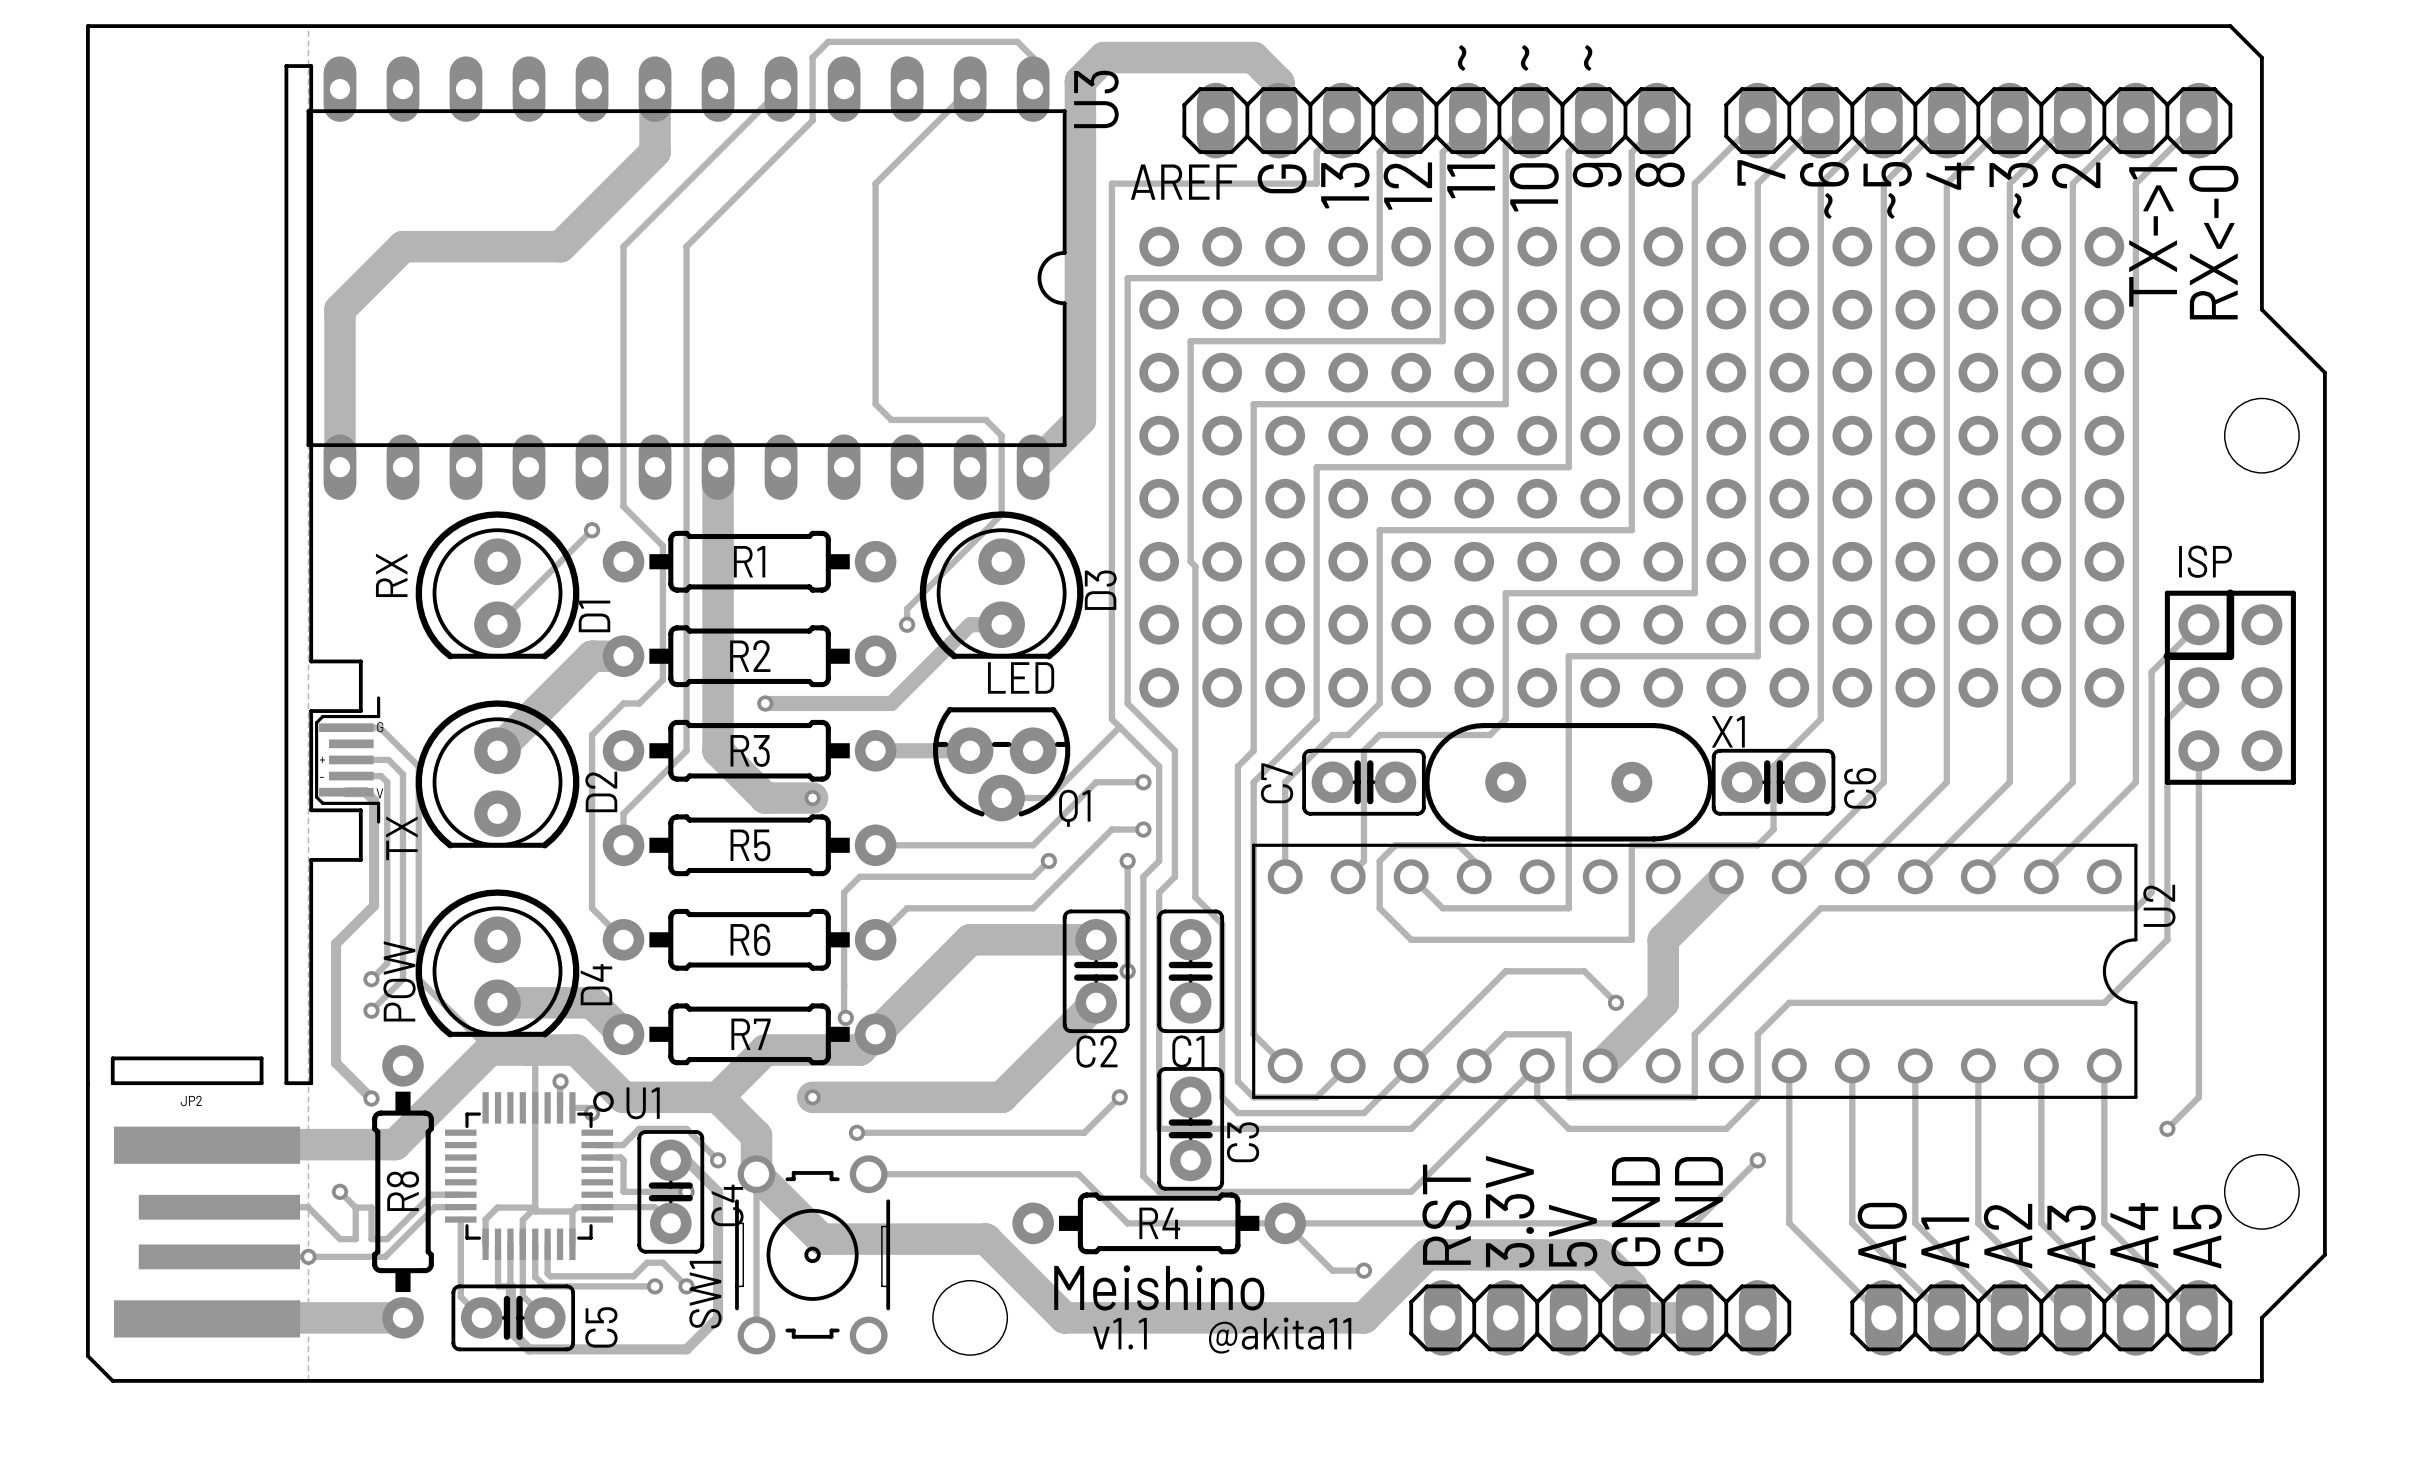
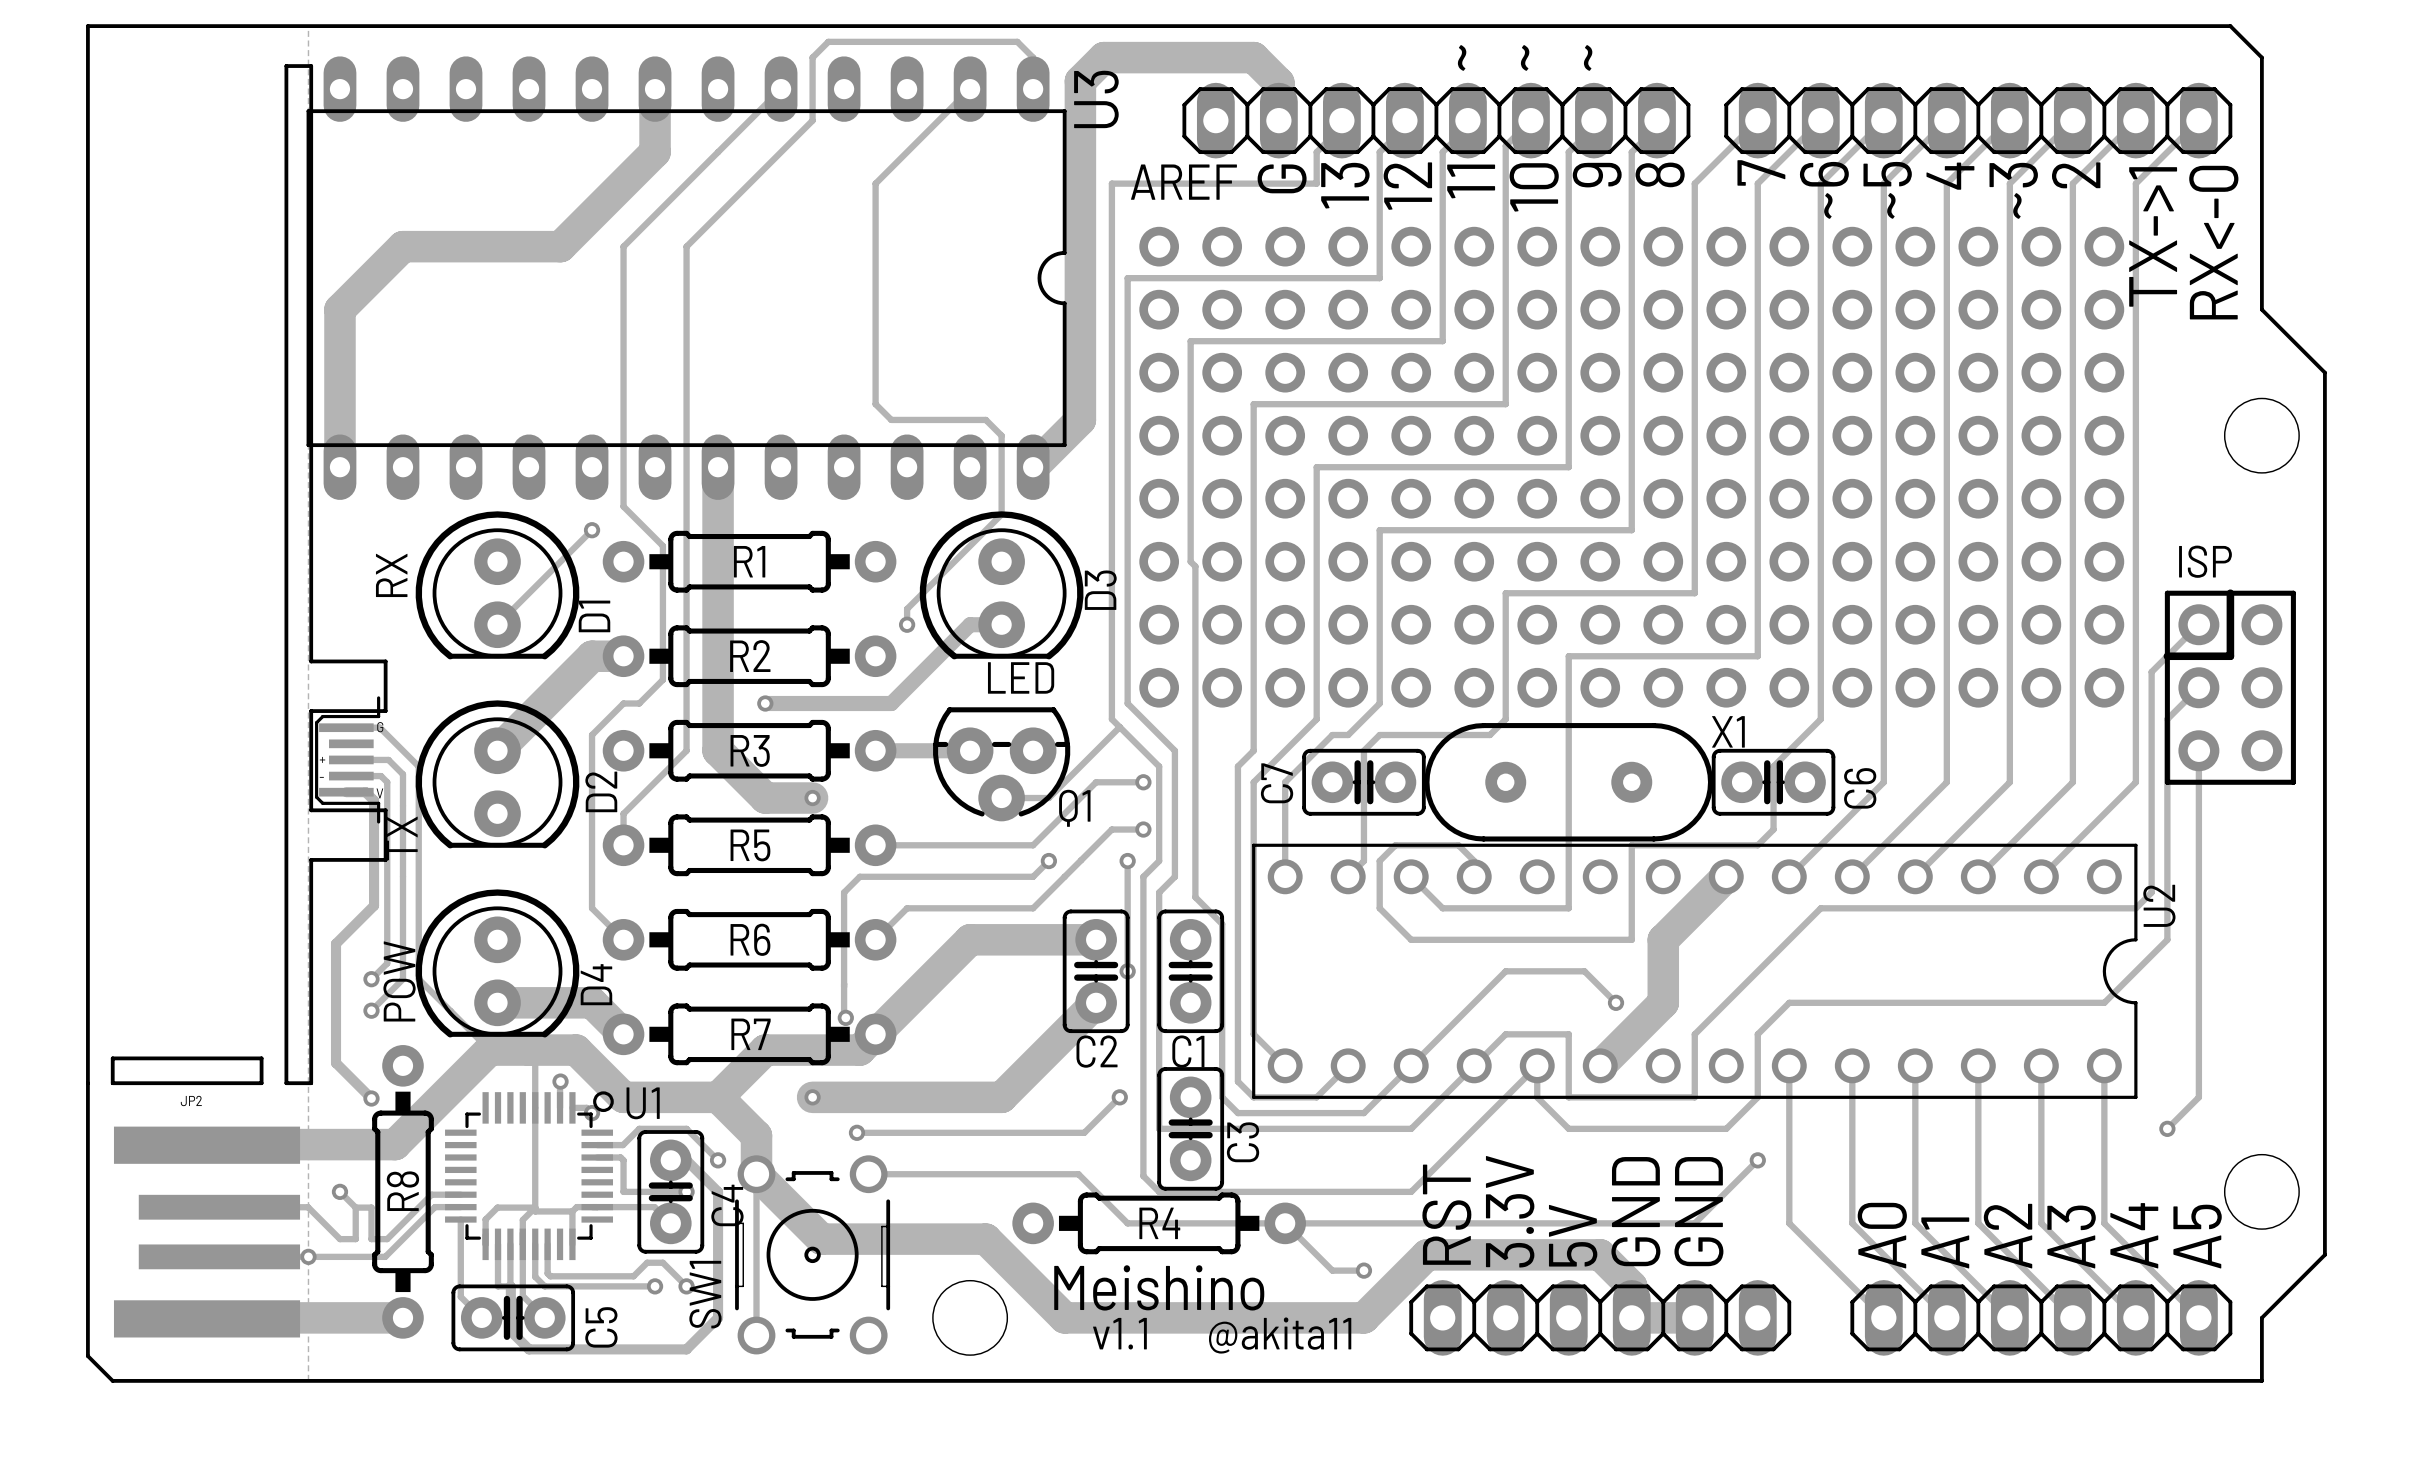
board edge: (360, 661) (360, 711) -> (360, 661) (385, 661) (385, 711) (360, 711)
board edge: (360, 810) (360, 859) -> (360, 810) (385, 810) (385, 859) (360, 859)

